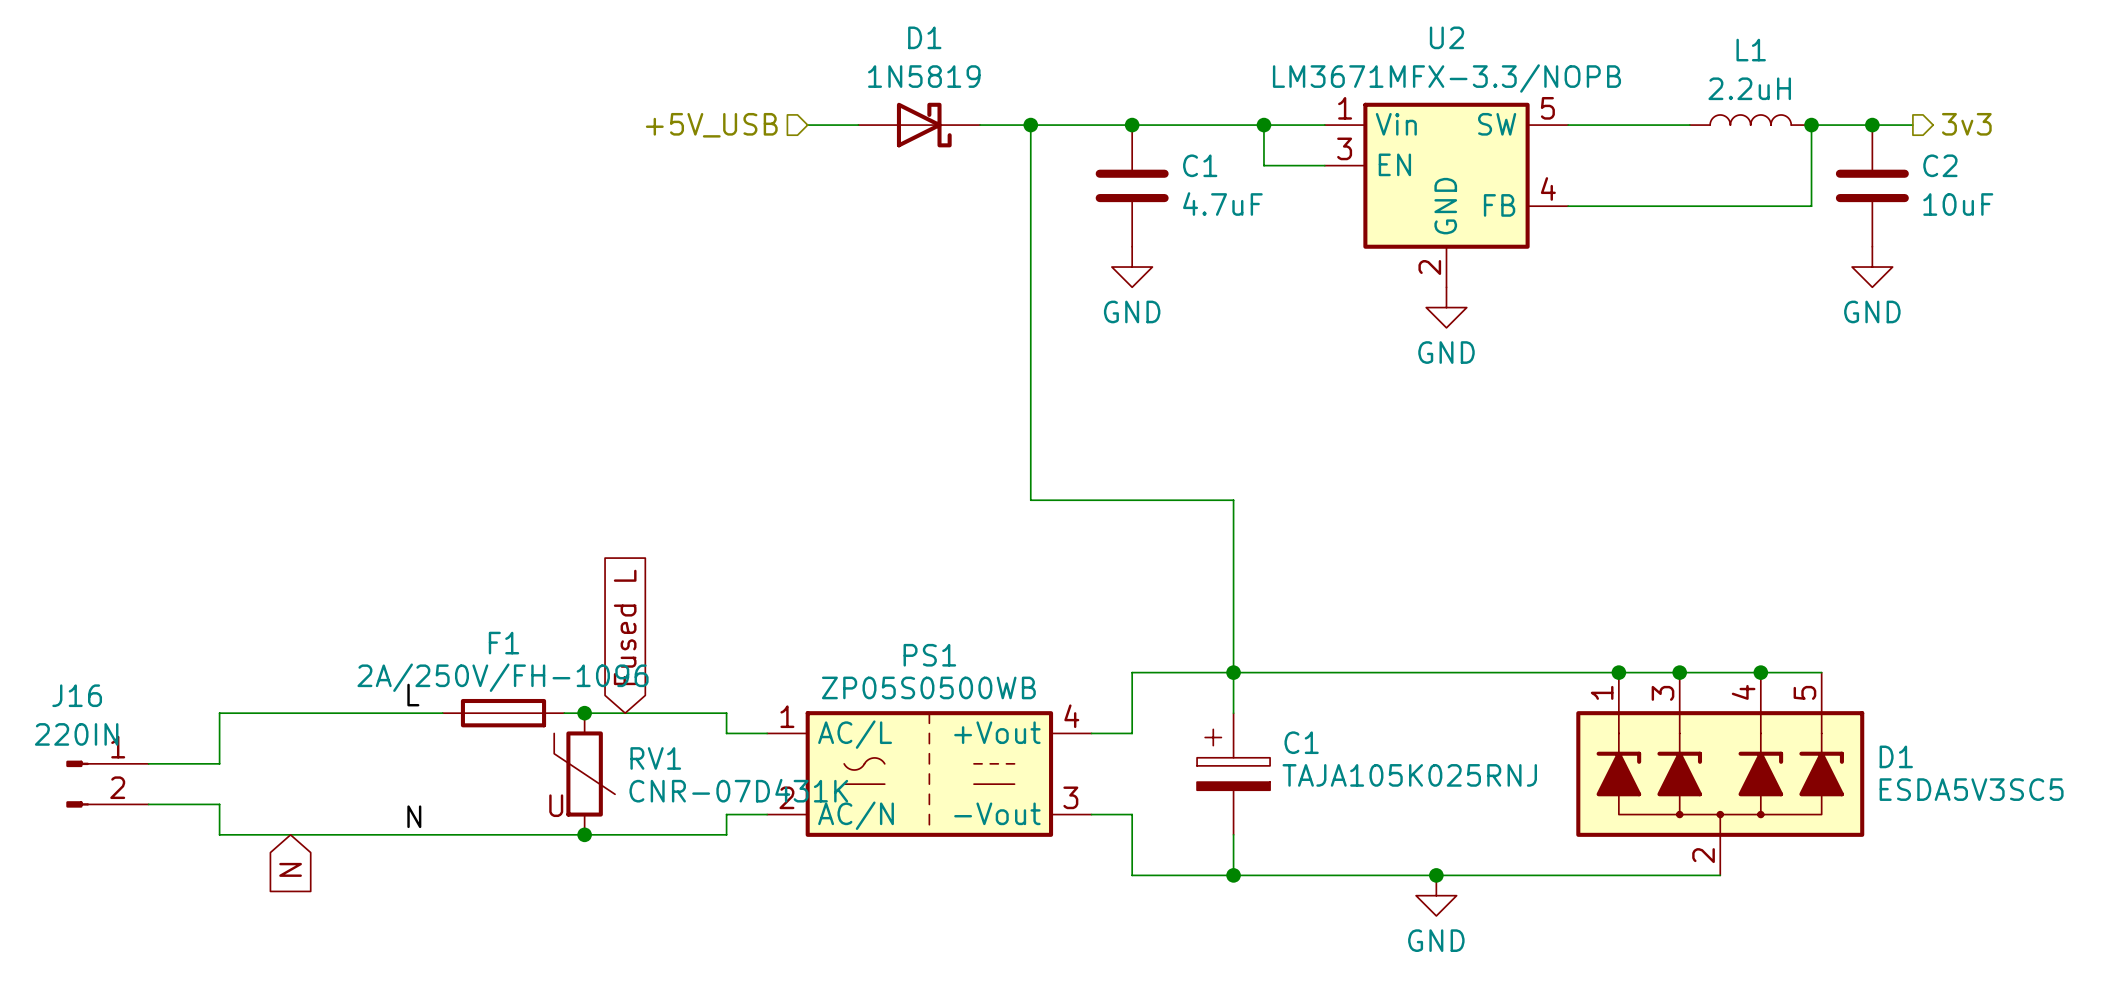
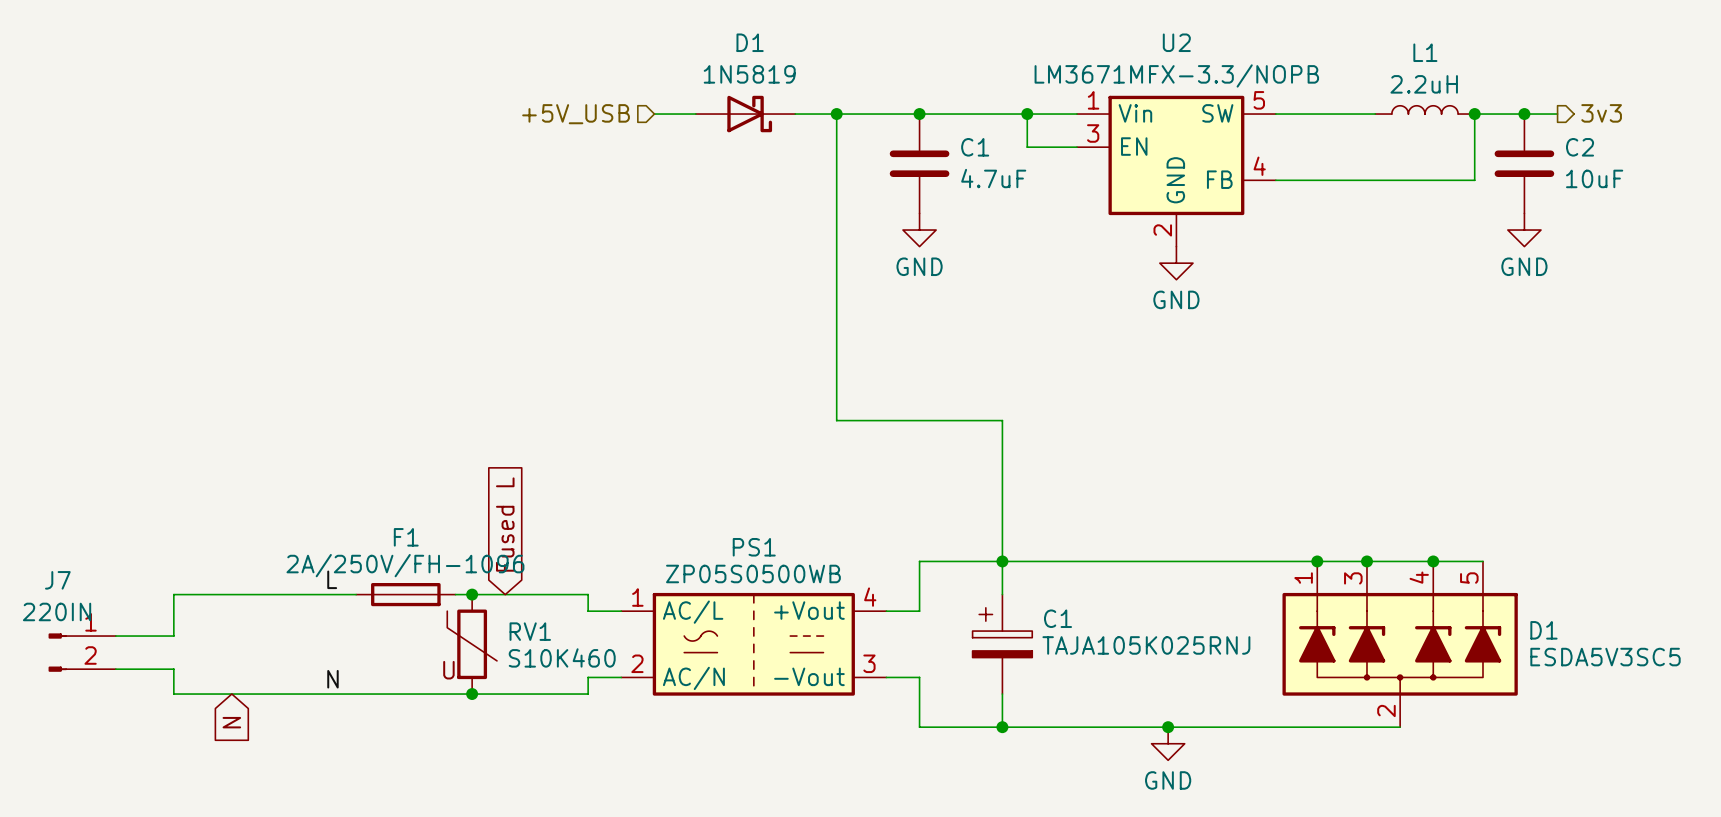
J16 name: J16 (77, 695) -> J7 (57, 580)
RV1 value: CNR-07D431K (738, 790) -> S10K460 (562, 657)

